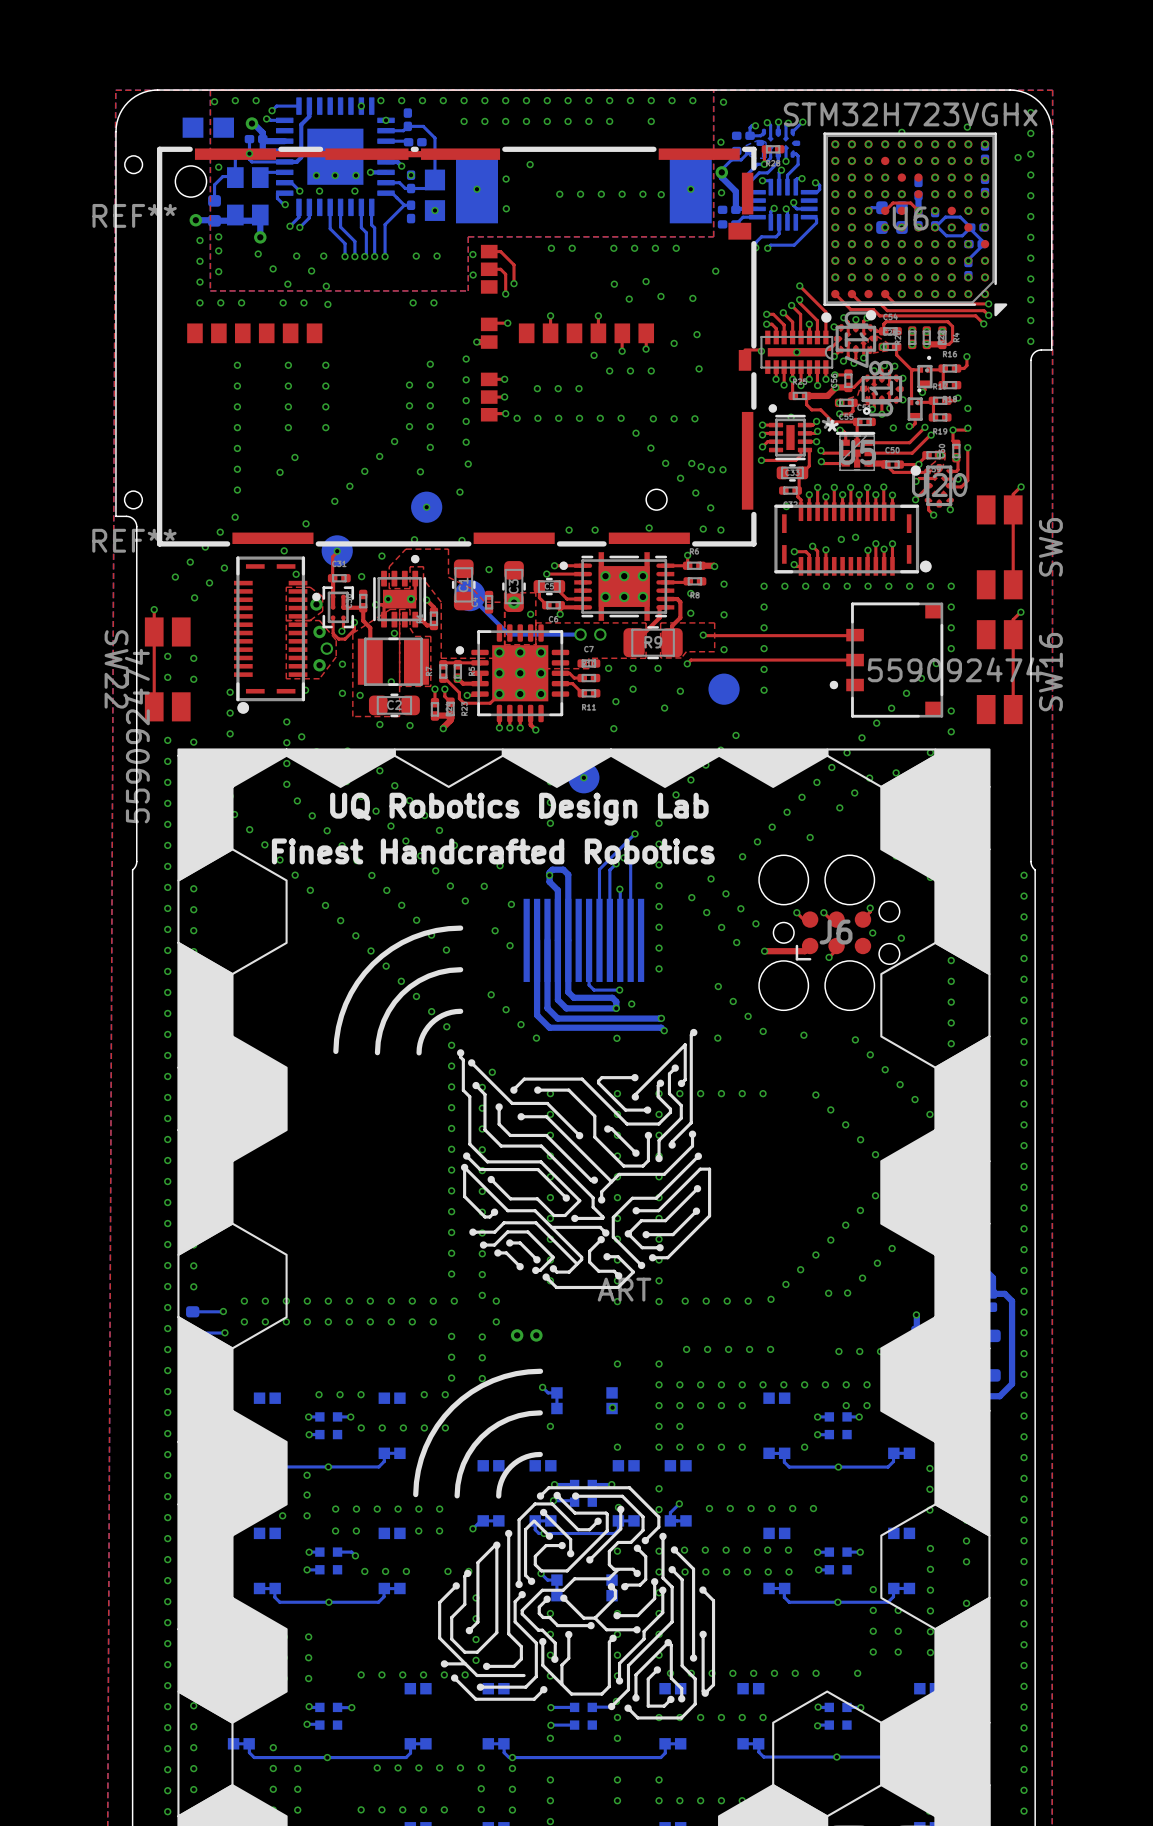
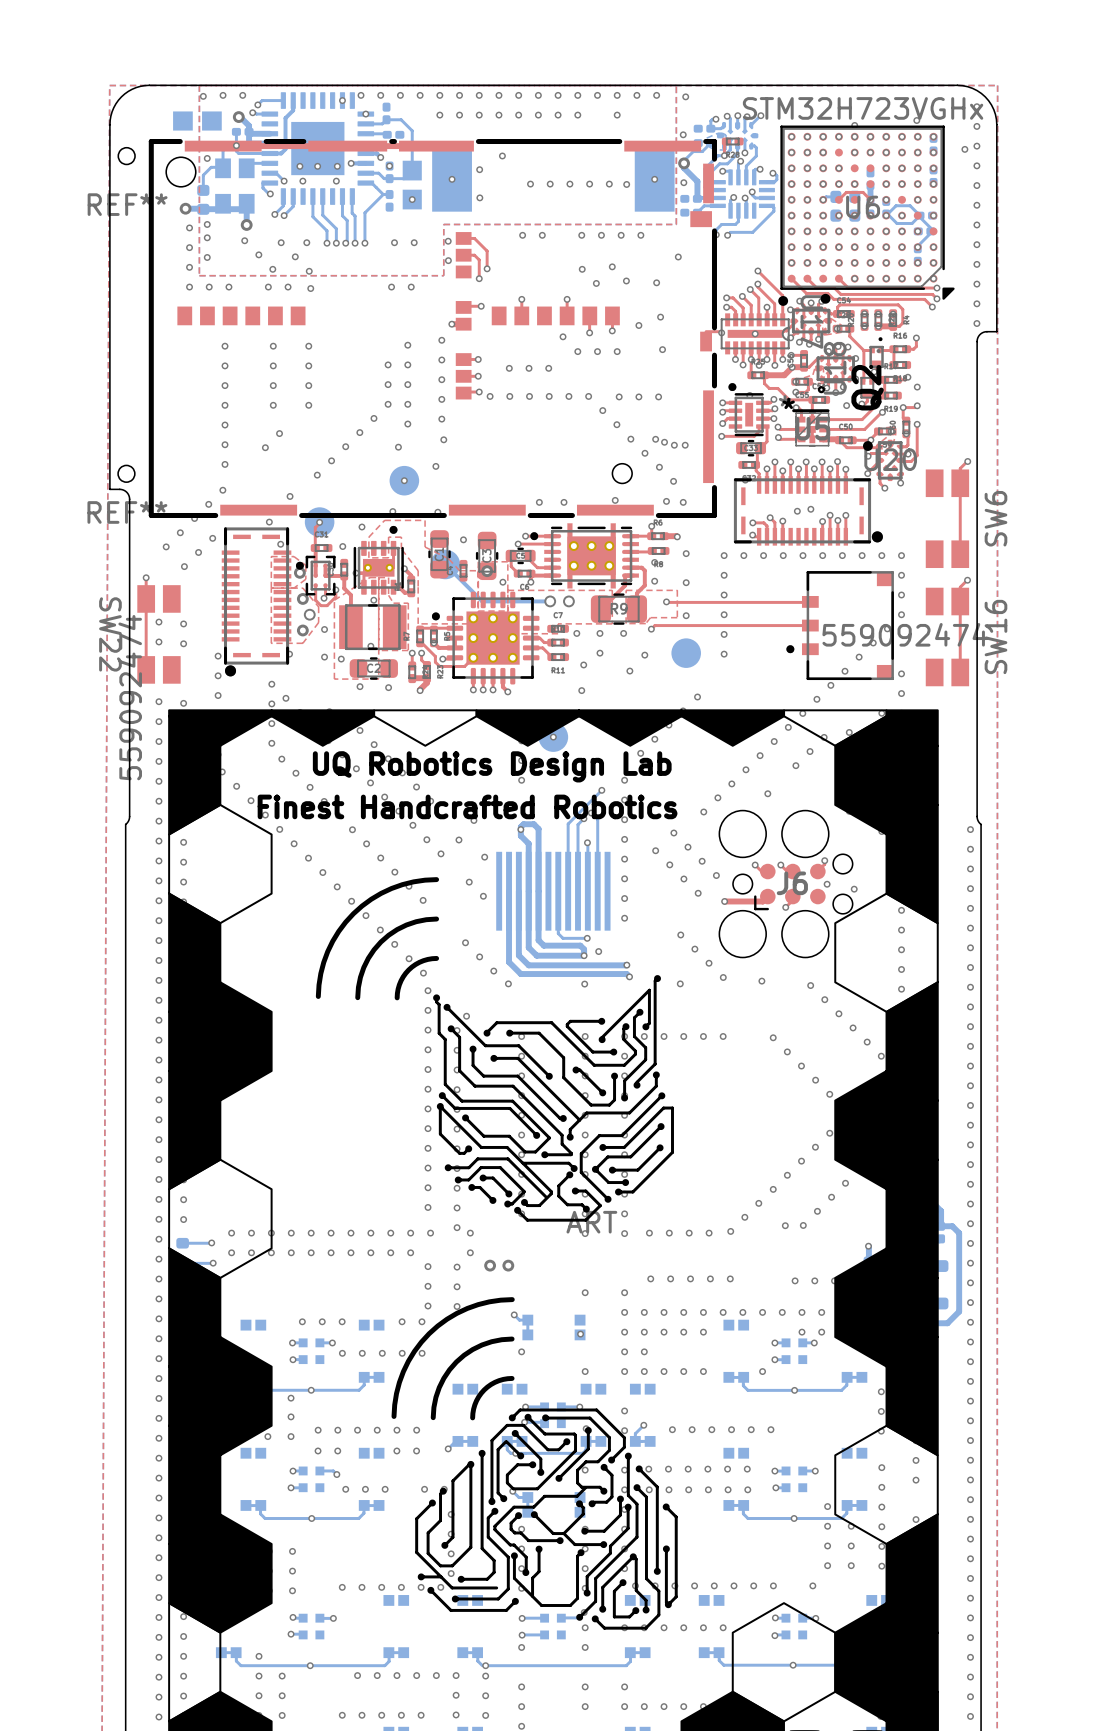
Q2: none -> (867, 381)
part: (915, 404) -> none

